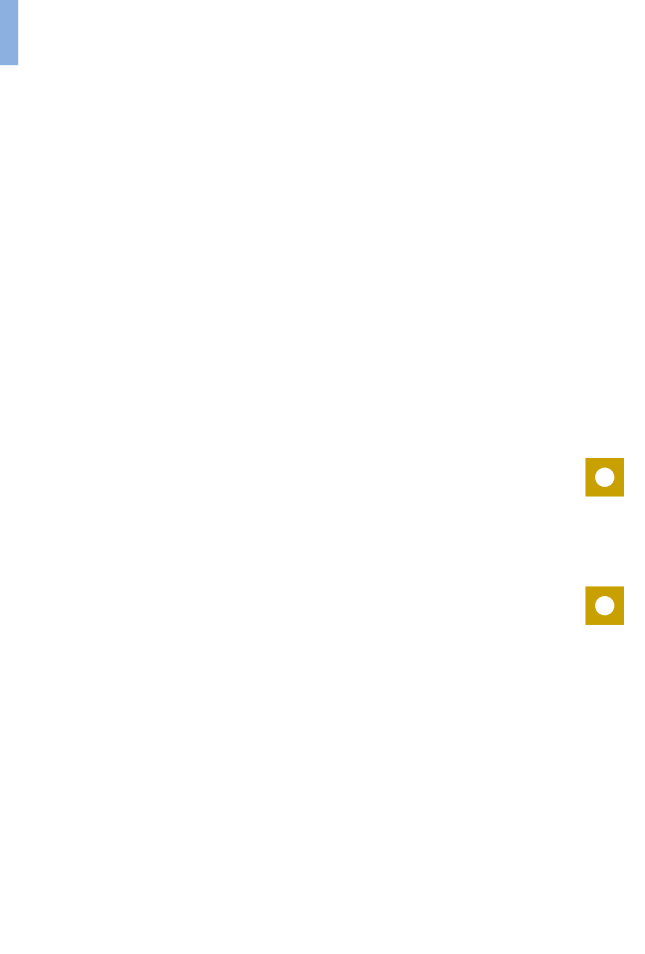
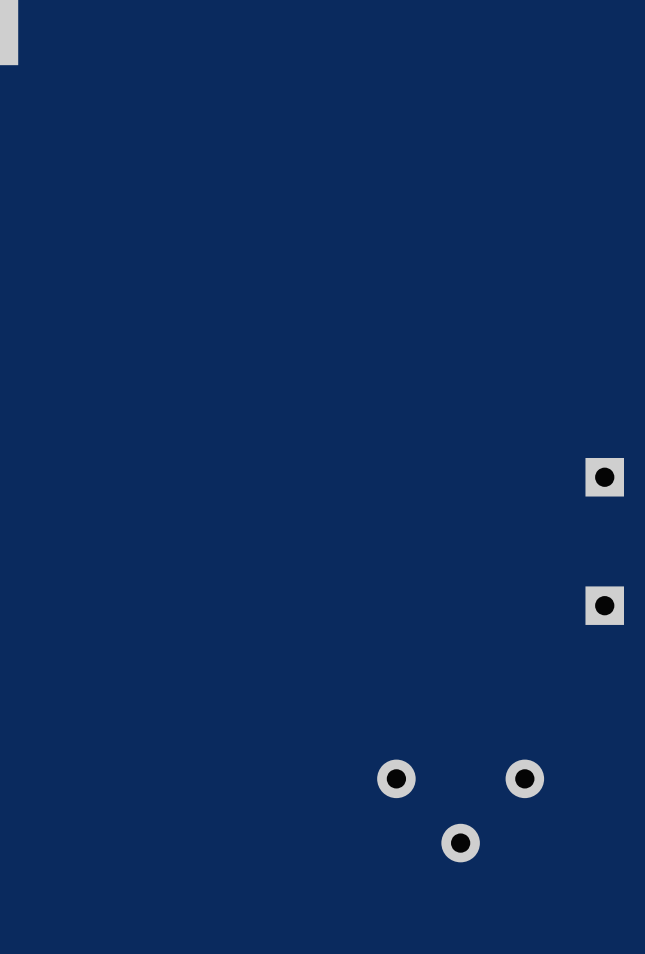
part: none -> (460, 810)

